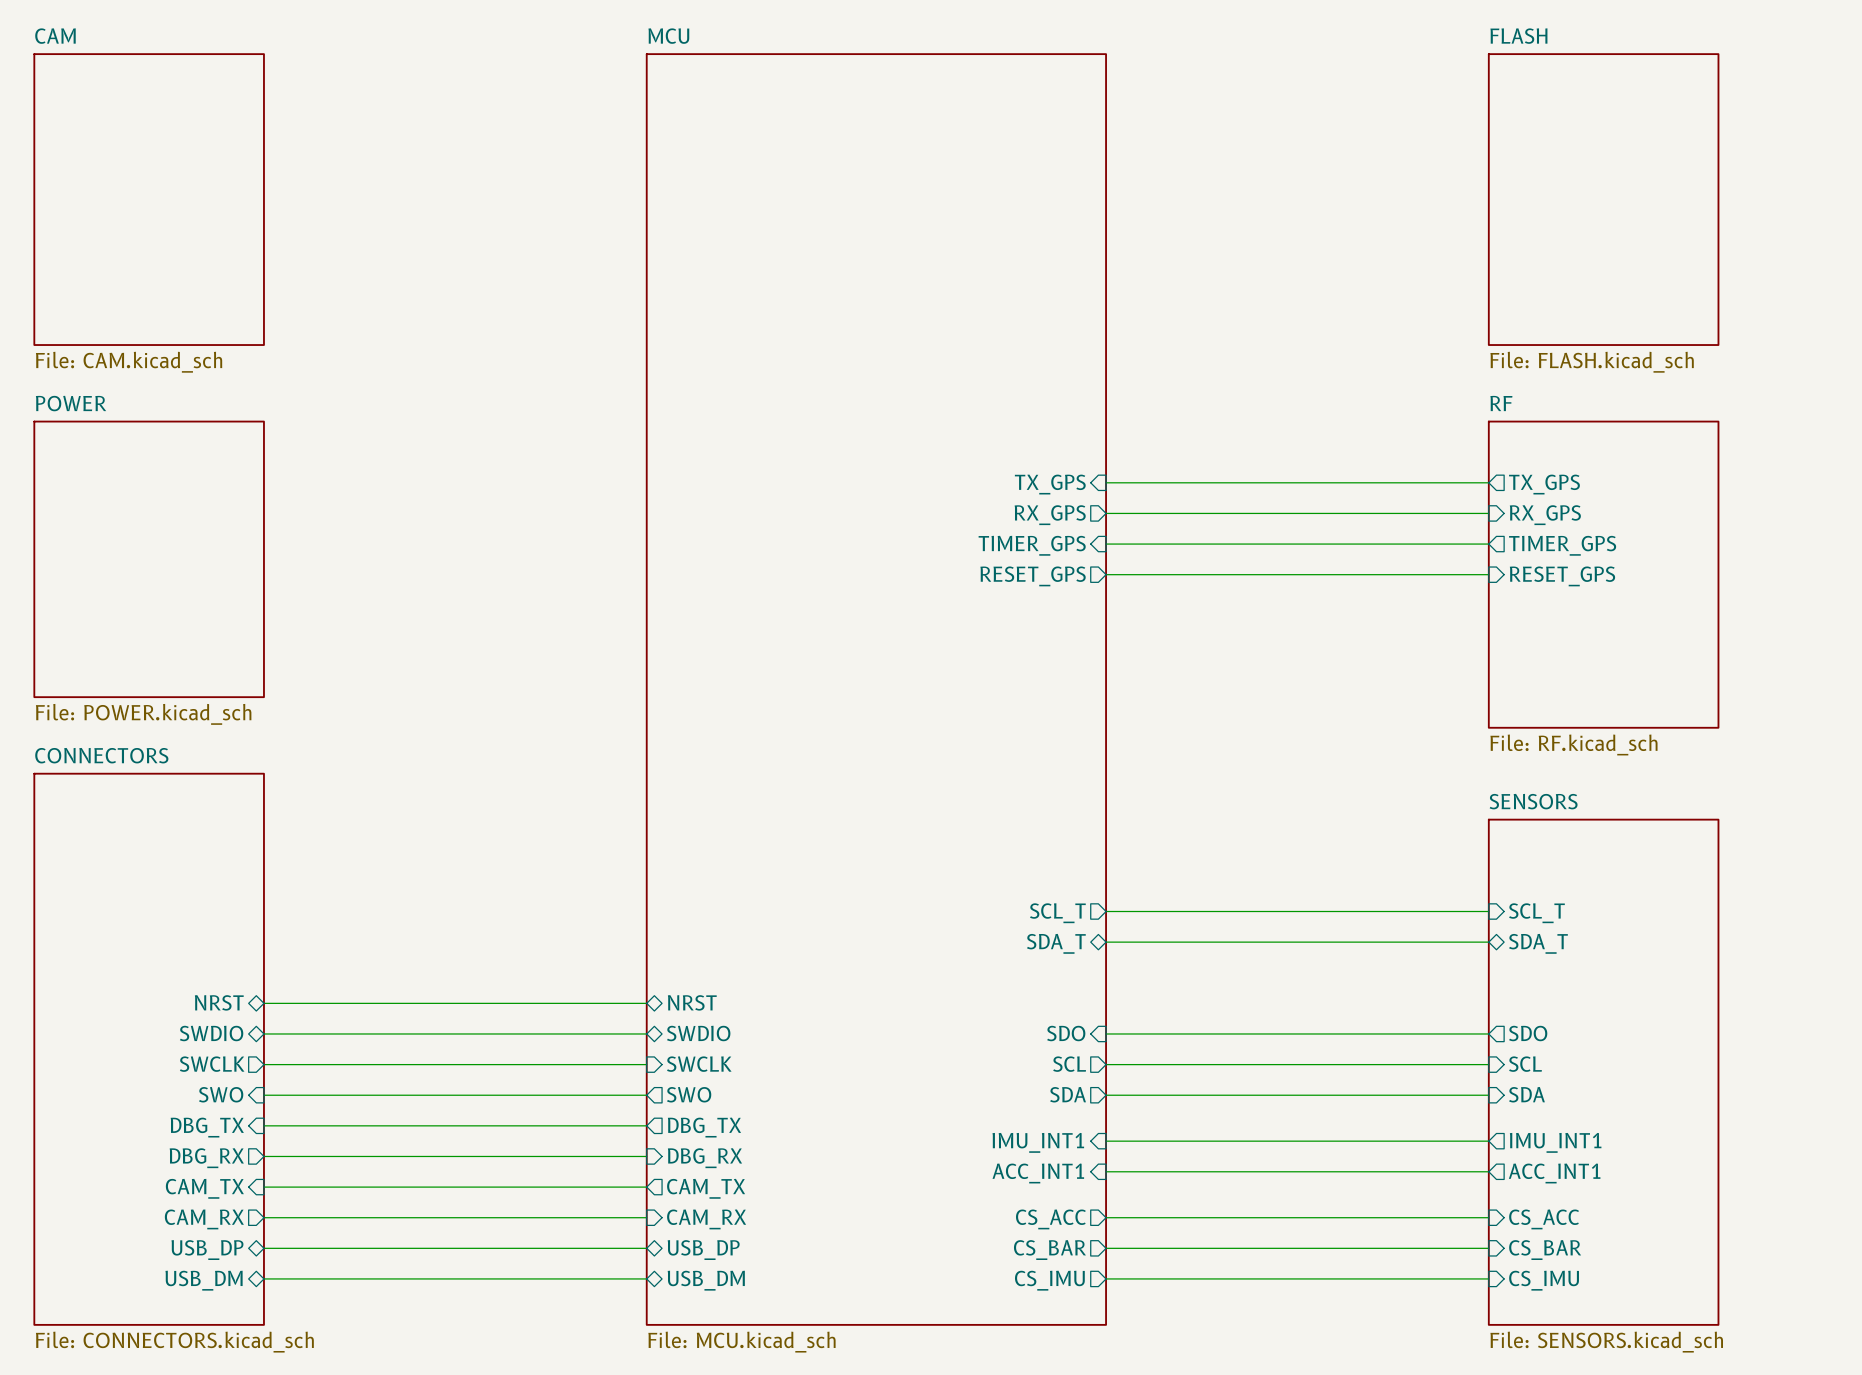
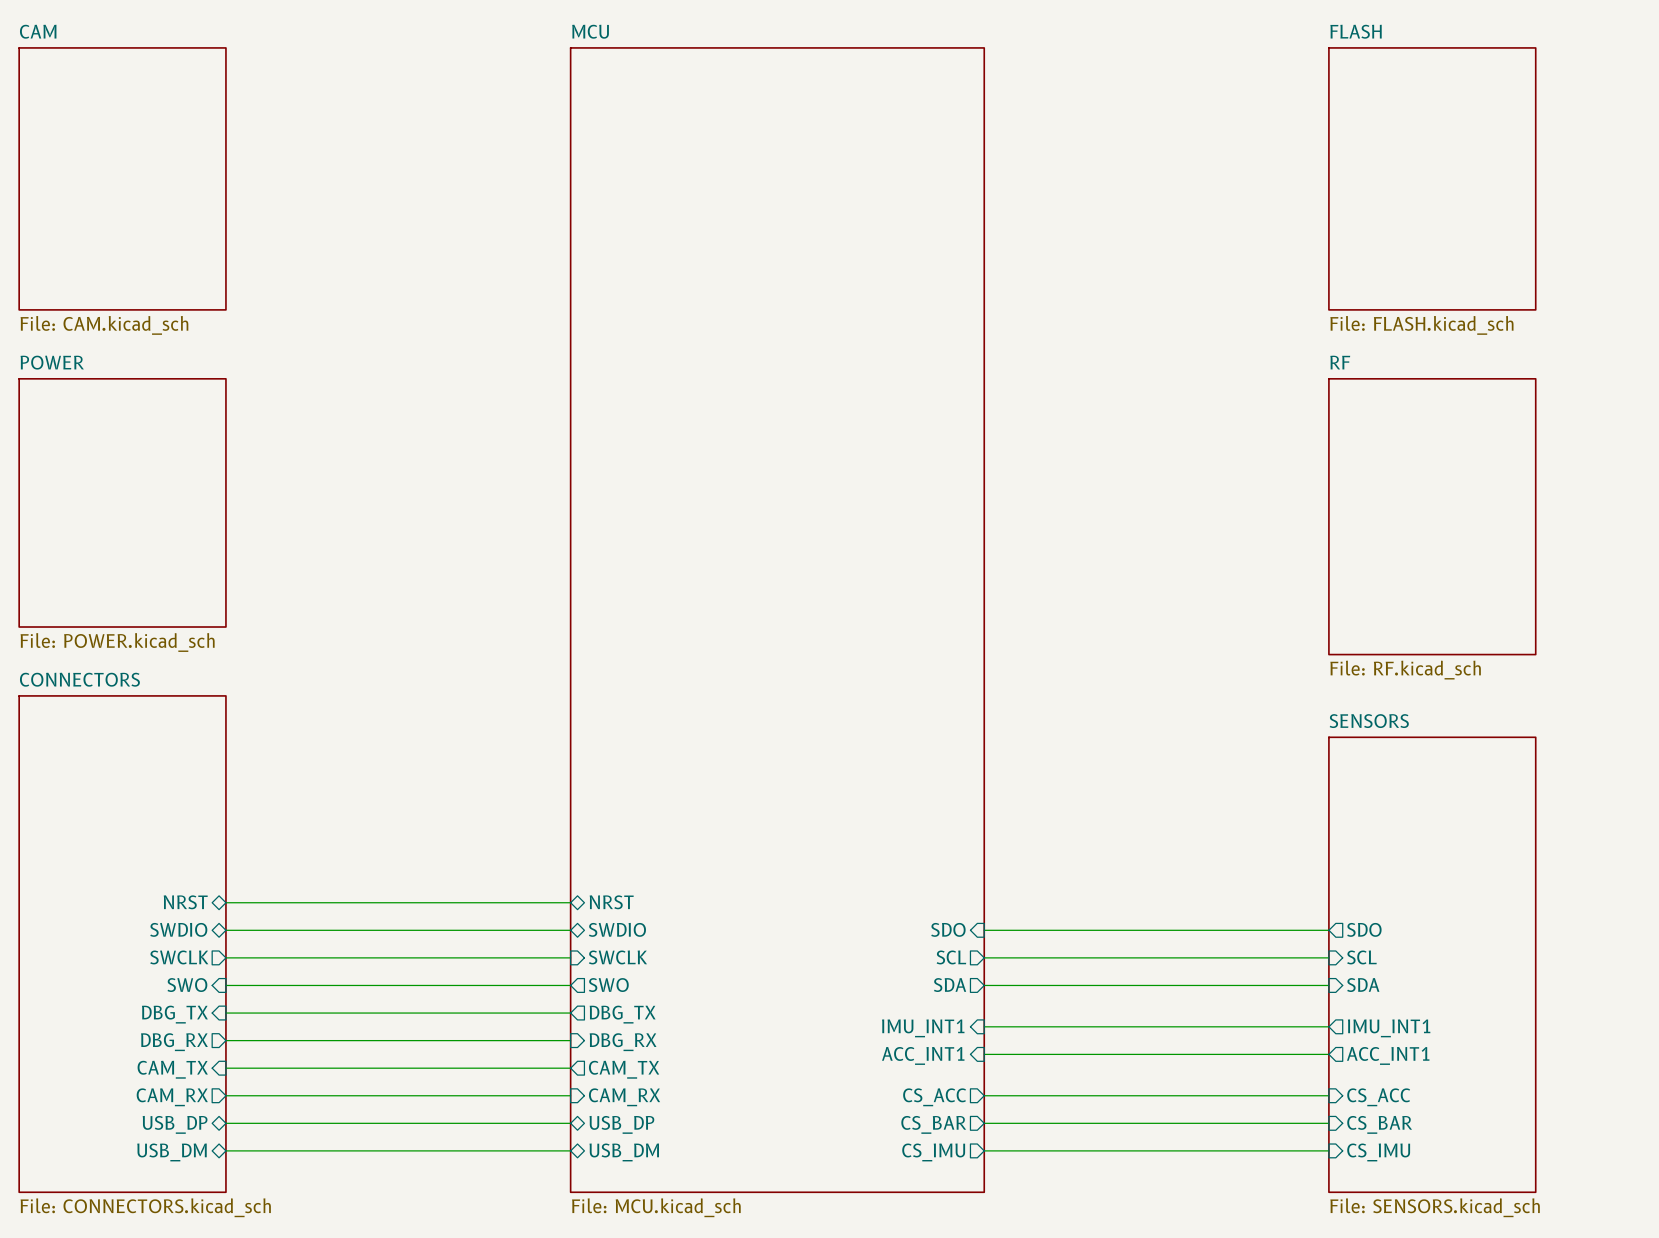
wire: (1106, 482) (1488, 482) -> none
sheet pin: TX_GPS (1050, 484) -> none
sheet pin: TX_GPS (1544, 484) -> none
wire: (1106, 513) (1488, 513) -> none
sheet pin: RX_GPS (1050, 515) -> none
sheet pin: RX_GPS (1545, 515) -> none
wire: (1106, 544) (1488, 544) -> none
sheet pin: TIMER_GPS (1032, 545) -> none
sheet pin: TIMER_GPS (1562, 545) -> none
wire: (1106, 574) (1488, 574) -> none
sheet pin: RESET_GPS (1033, 576) -> none
sheet pin: RESET_GPS (1562, 576) -> none
wire: (1106, 911) (1488, 911) -> none
sheet pin: SCL_T (1057, 913) -> none
sheet pin: SCL_T (1536, 913) -> none
wire: (1106, 942) (1488, 942) -> none
sheet pin: SDA_T (1056, 943) -> none
sheet pin: SDA_T (1538, 943) -> none

